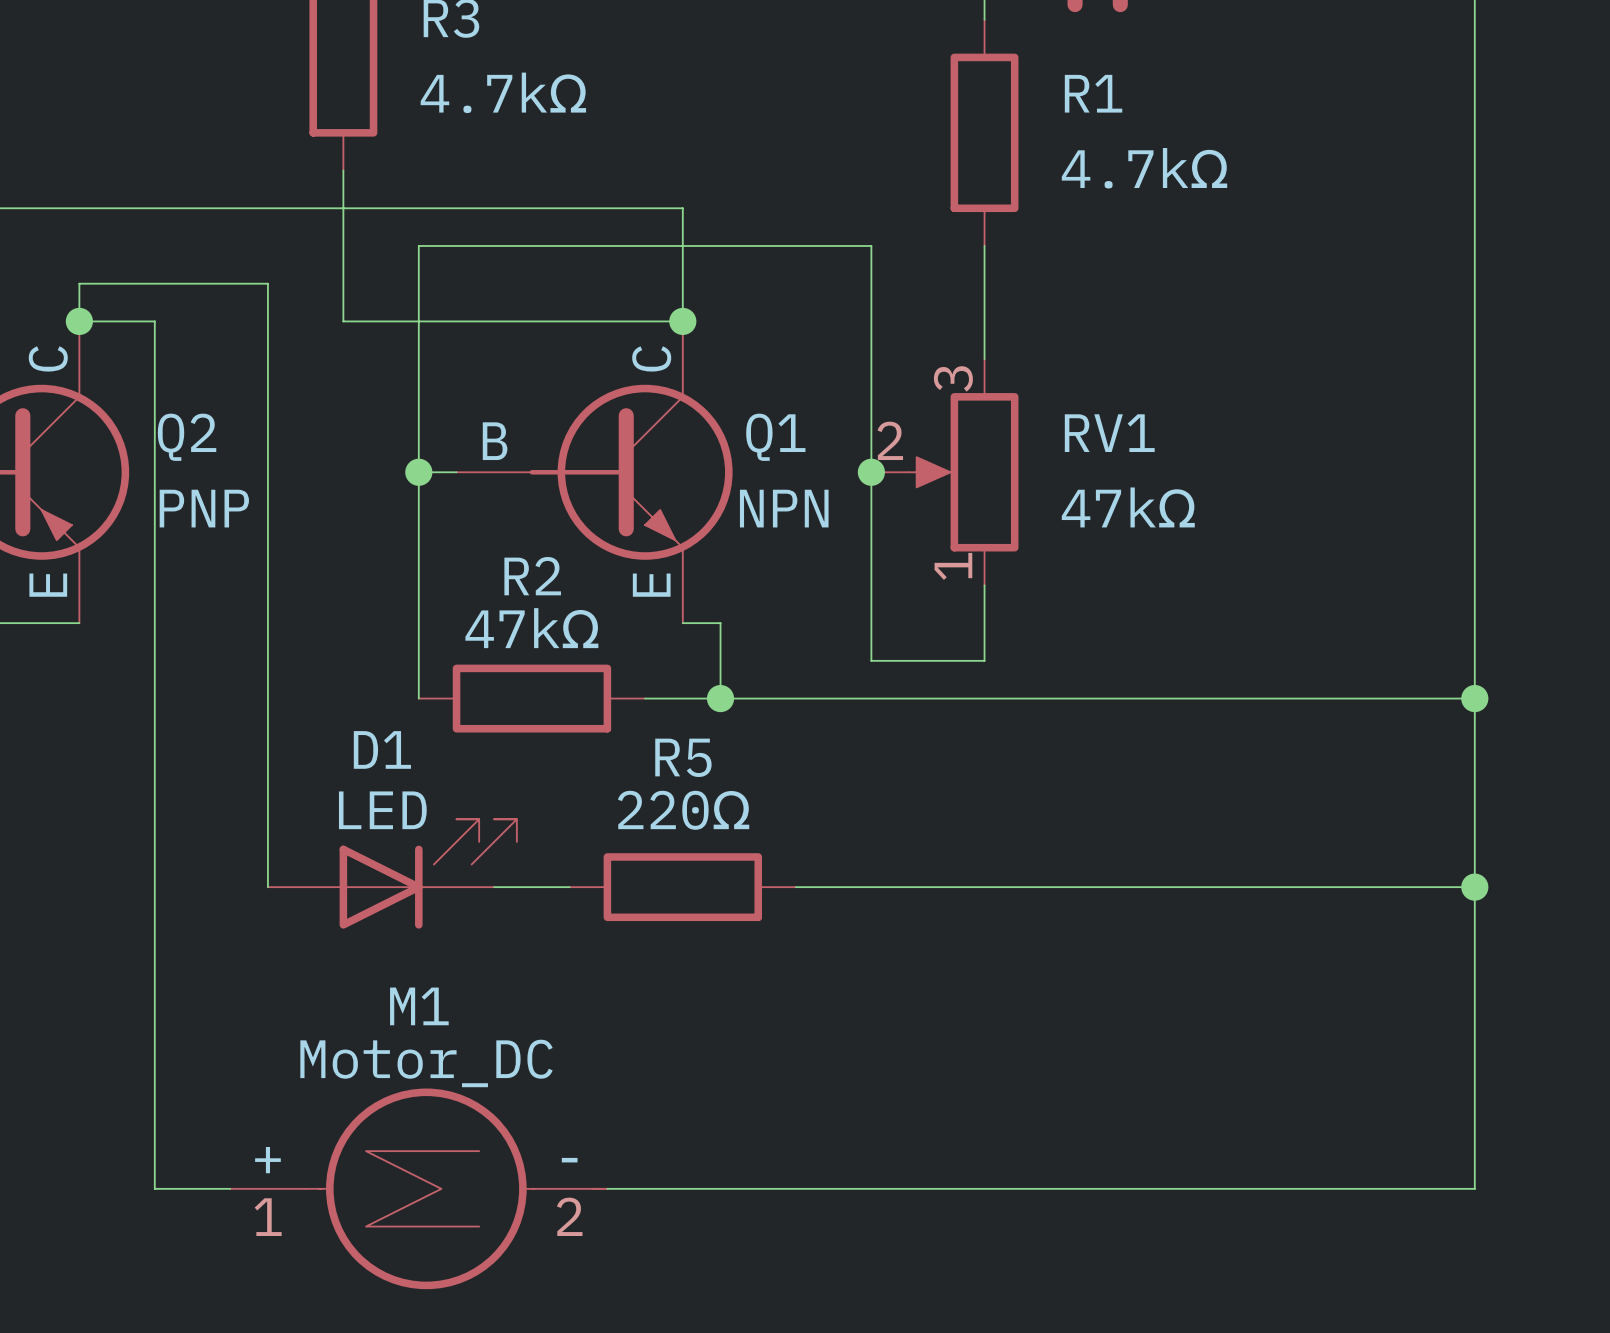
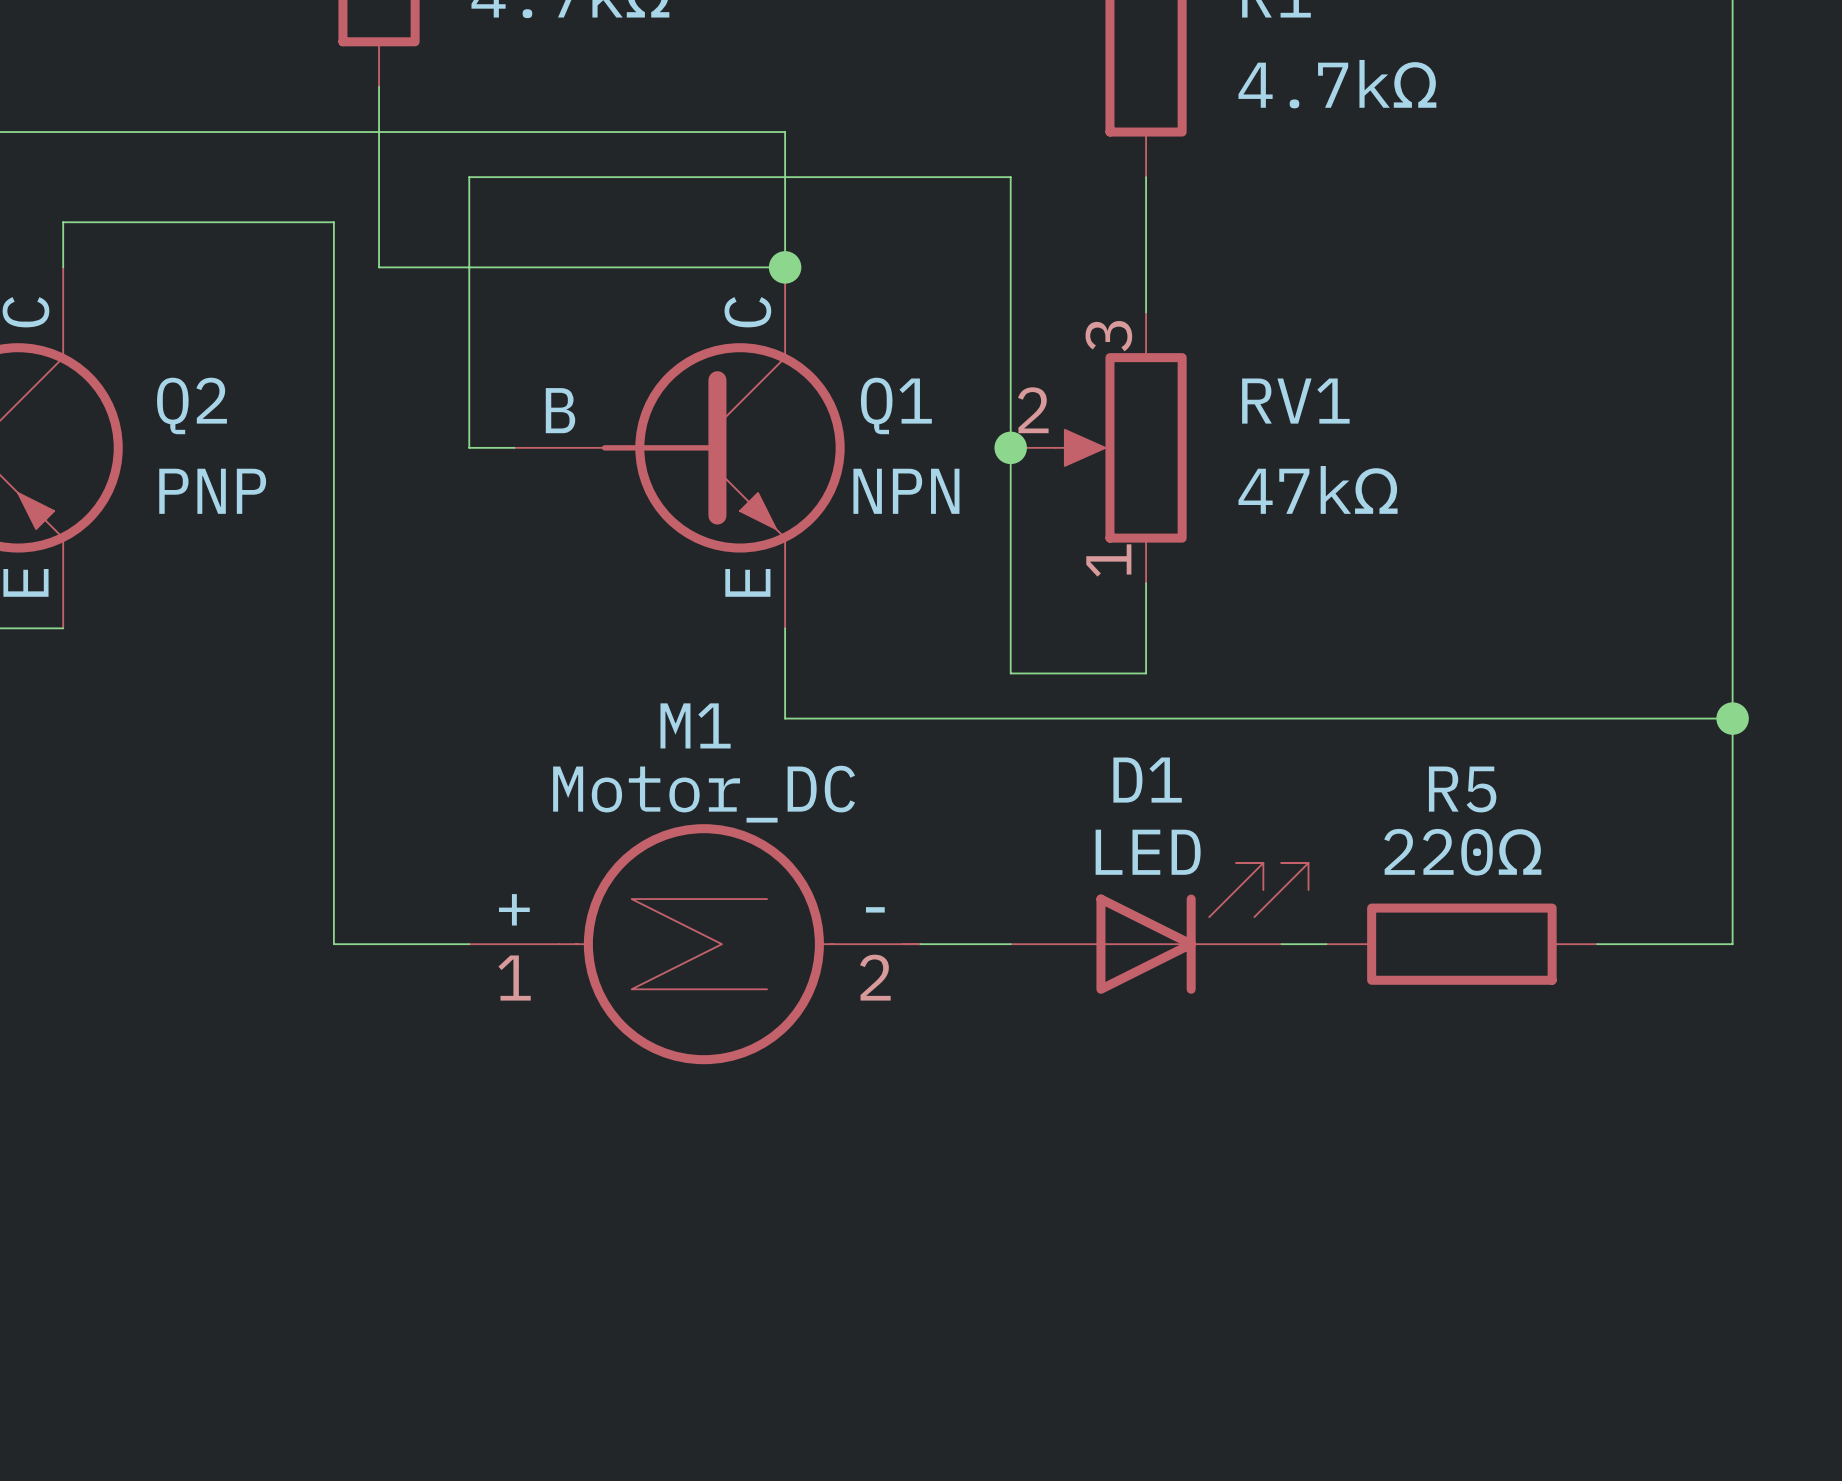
wire: (267, 283) (267, 887) -> (288, 222) (333, 222) (333, 944) (469, 944)
wire: (79, 321) (154, 321) (154, 1188) (230, 1188) -> none
junction: (79, 321) -> none
wire: (418, 472) (418, 698) -> none
junction: (418, 472) -> none
wire: (682, 623) (720, 623) (720, 698) -> (785, 628) (785, 718)
R2: 47kΩ (531, 698) -> none
wire: (645, 698) (682, 698) -> none
junction: (720, 698) -> none
D1 position: (392, 873) -> (1159, 928)
wire: (494, 887) (569, 887) -> none
R5 position: (682, 887) -> (1461, 944)
wire: (1135, 887) (1361, 887) -> none
wire: (1474, 887) (1474, 1188) (607, 1188) -> none
junction: (1474, 887) -> none
M1 position: (418, 1188) -> (694, 944)

